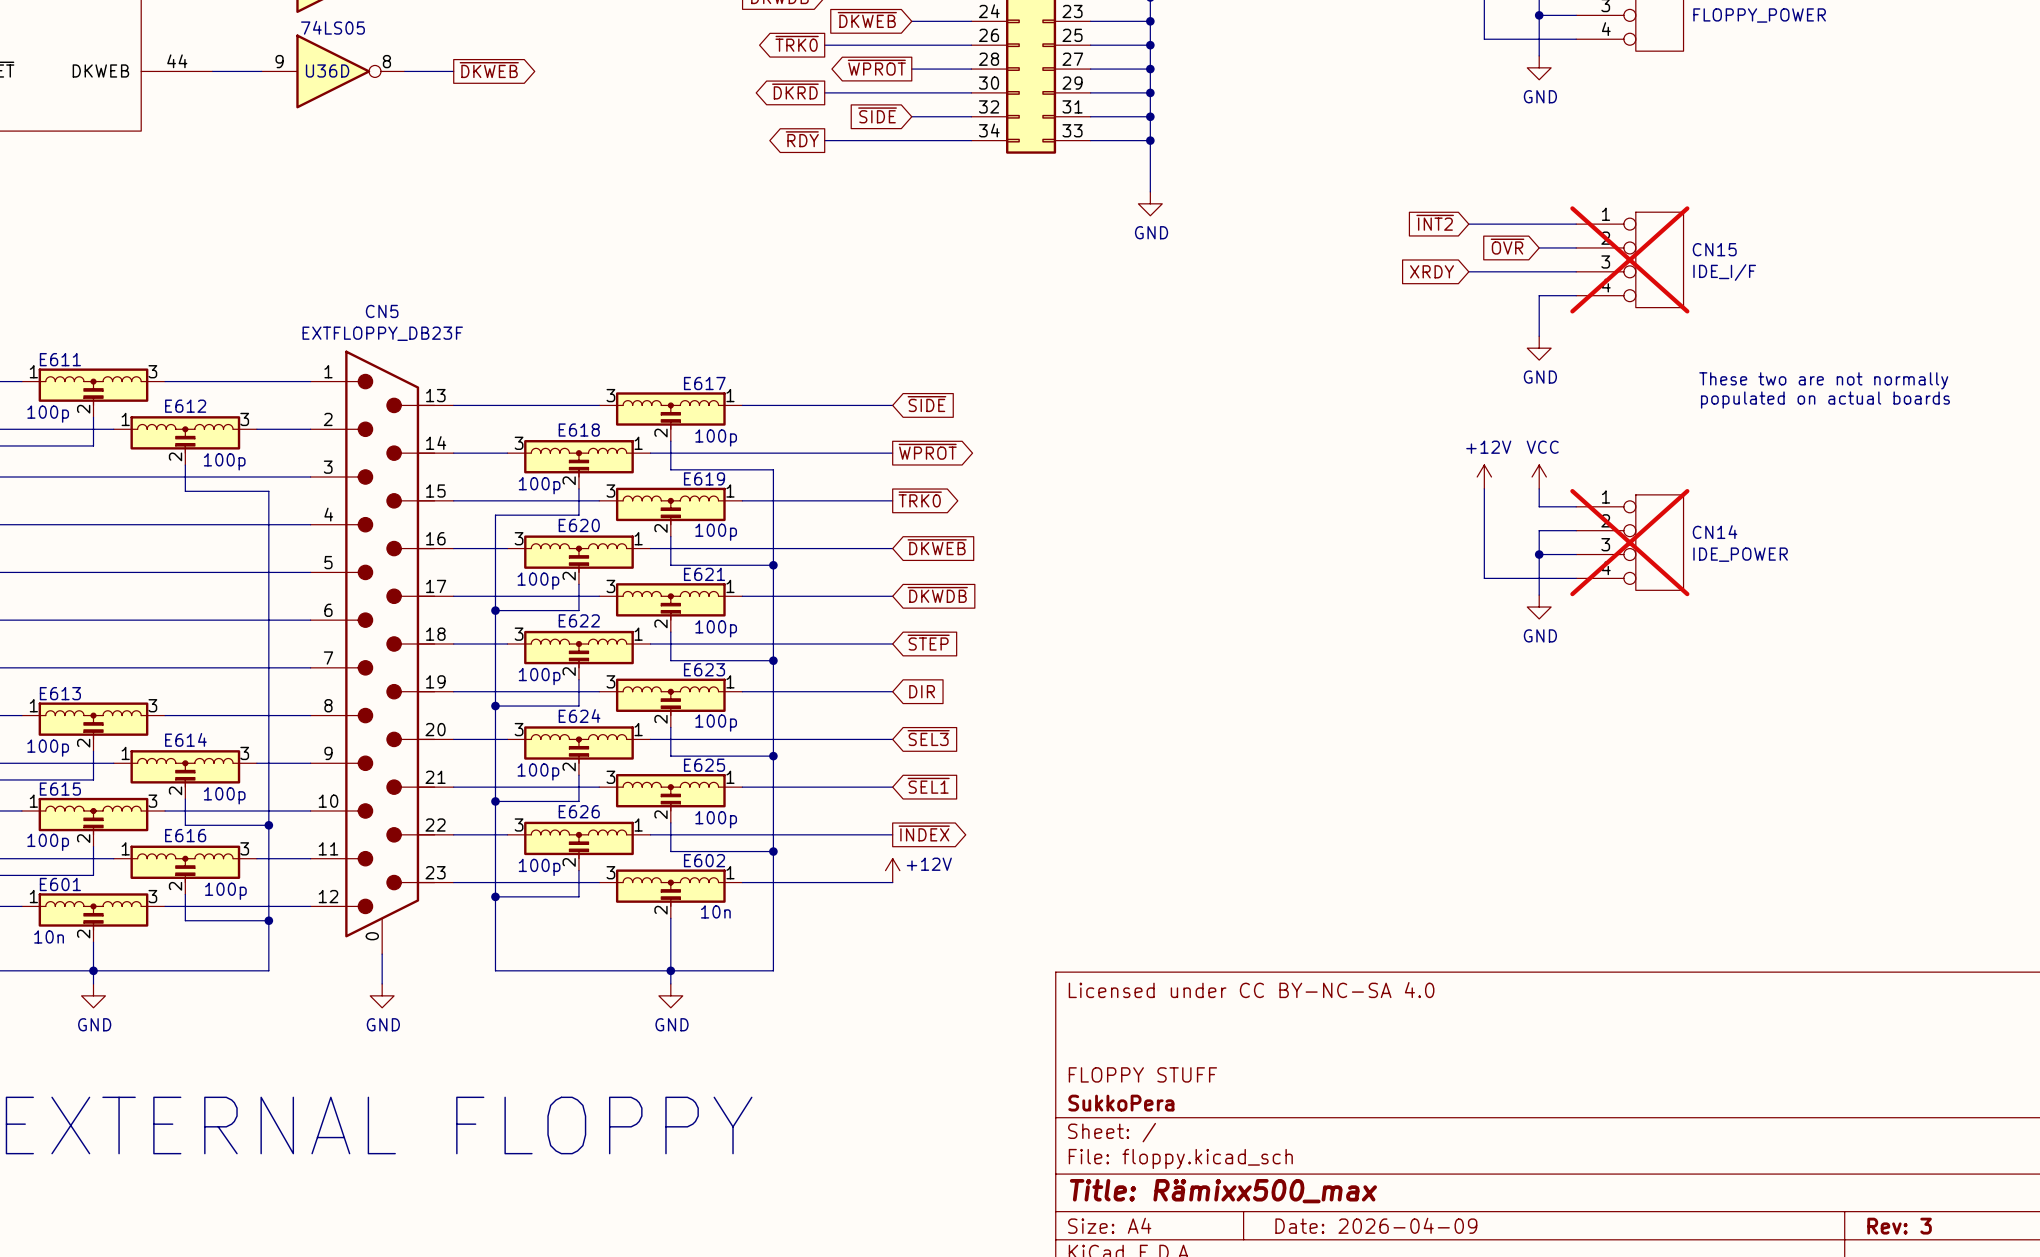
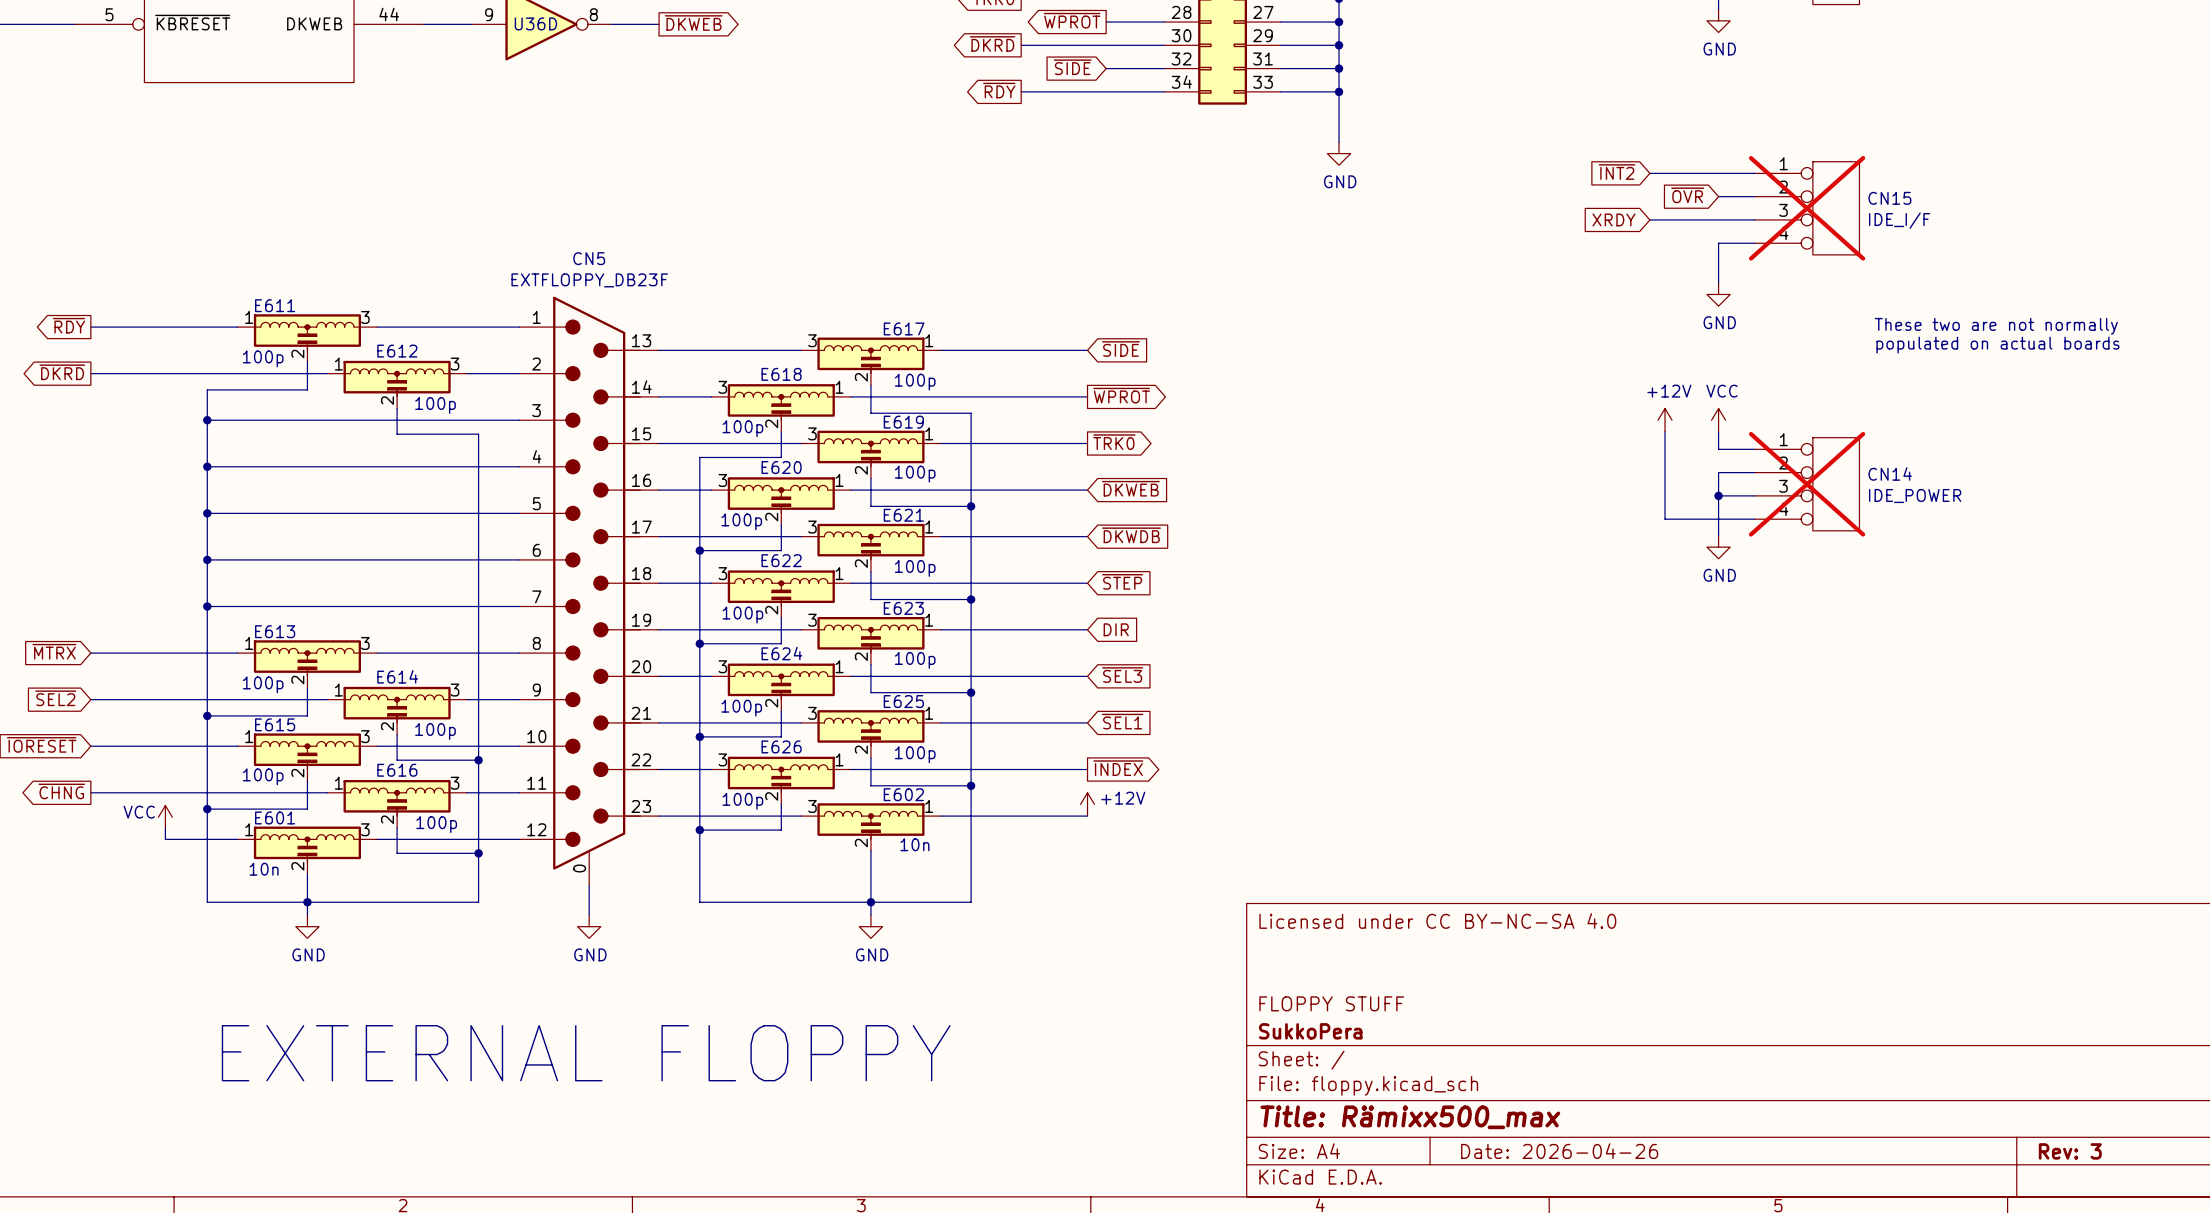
title block: Date: 2026-04-09 (1376, 1225) -> Date: 2026-04-26 (1559, 1151)

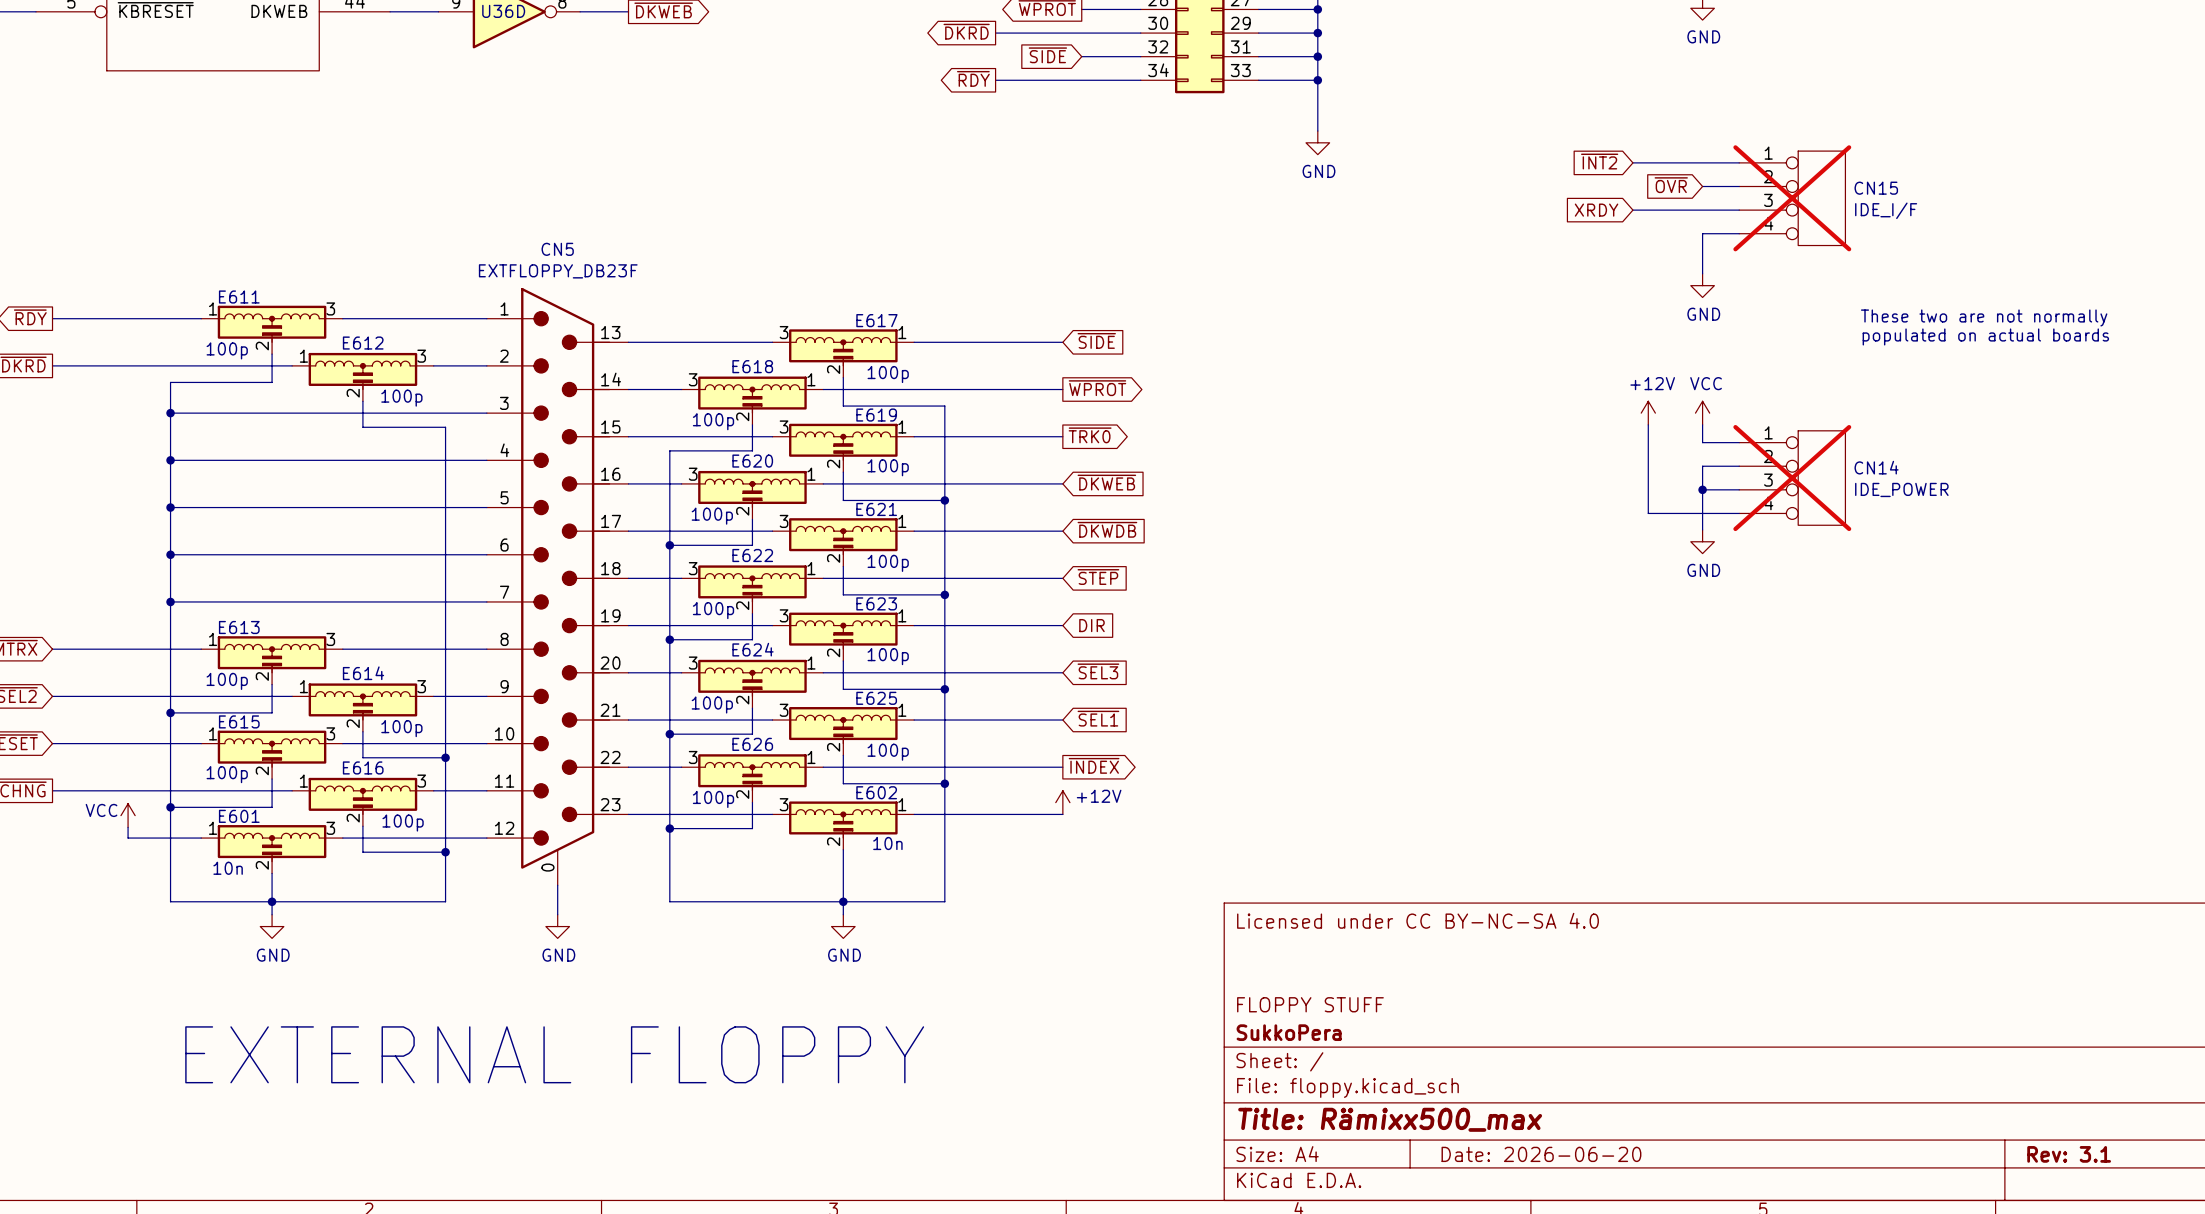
title block: Date: 2026-04-26 (1559, 1151) -> Date: 2026-06-20 (1541, 1154)
title block: Rev: 3 (2070, 1151) -> Rev: 3.1 (2069, 1154)

